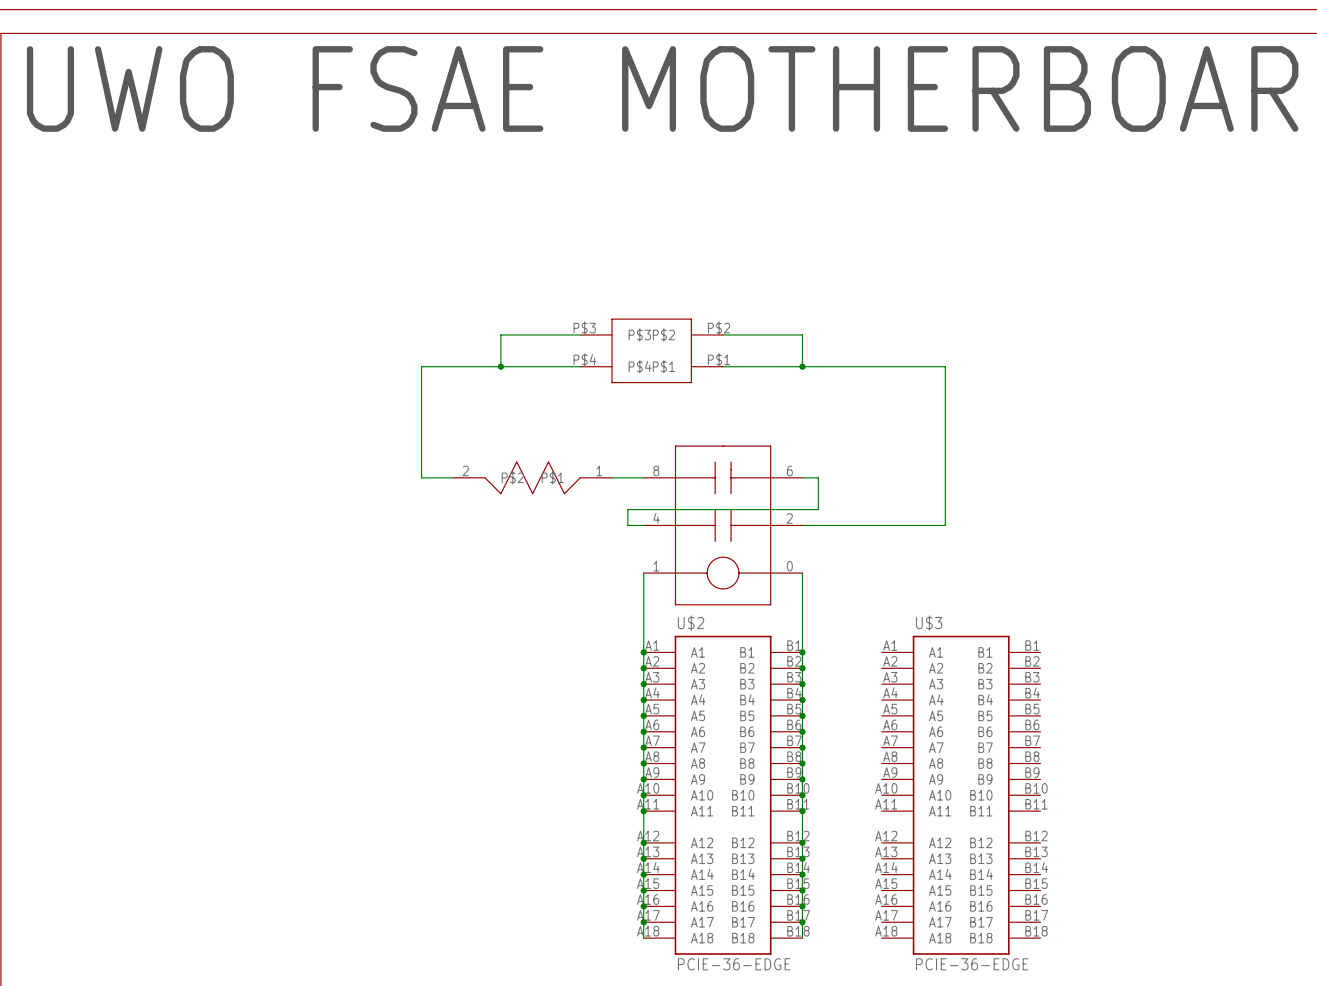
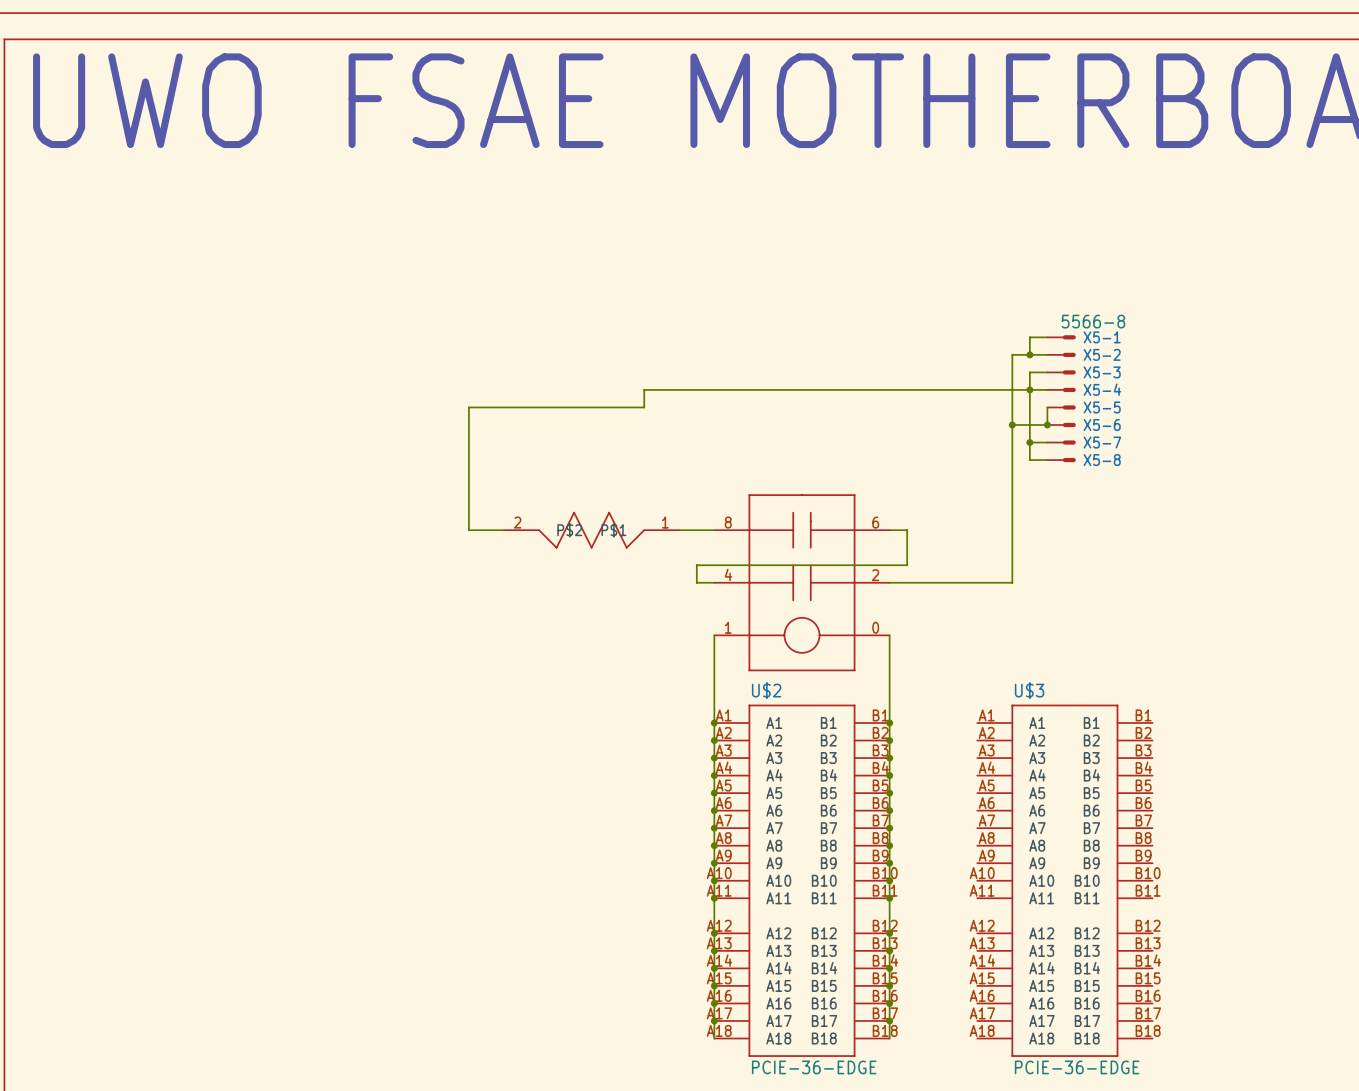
wire: none -> (1047, 337) (1029, 337) (1029, 354)
X5-1: none -> 5566-8 (1061, 337)
junction: none -> (1029, 354)
X5-2: none -> (1061, 354)
wire: (580, 334) (500, 334) (500, 366) -> none
wire: (723, 334) (802, 334) (802, 366) -> none
wire: none -> (1047, 372) (1029, 372) (1029, 460) (1047, 460)
X5-3: none -> (1061, 372)
part: (651, 350) -> none
junction: none -> (1029, 389)
wire: none -> (1047, 389) (644, 389) (644, 407)
X5-4: none -> (1061, 389)
junction: (500, 366) -> none
wire: (723, 366) (945, 366) -> none
junction: (802, 366) -> none
X5-5: none -> (1061, 407)
wire: none -> (1012, 425) (1047, 425)
junction: none -> (1012, 425)
wire: (945, 382) (945, 525) (913, 525) -> (1047, 354) (1012, 354) (1012, 582)
junction: none -> (1047, 425)
X5-6: none -> (1061, 425)
wire: none -> (1029, 442) (1047, 442)
junction: none -> (1029, 442)
X5-7: none -> (1061, 442)
X5-8: none -> (1061, 460)

